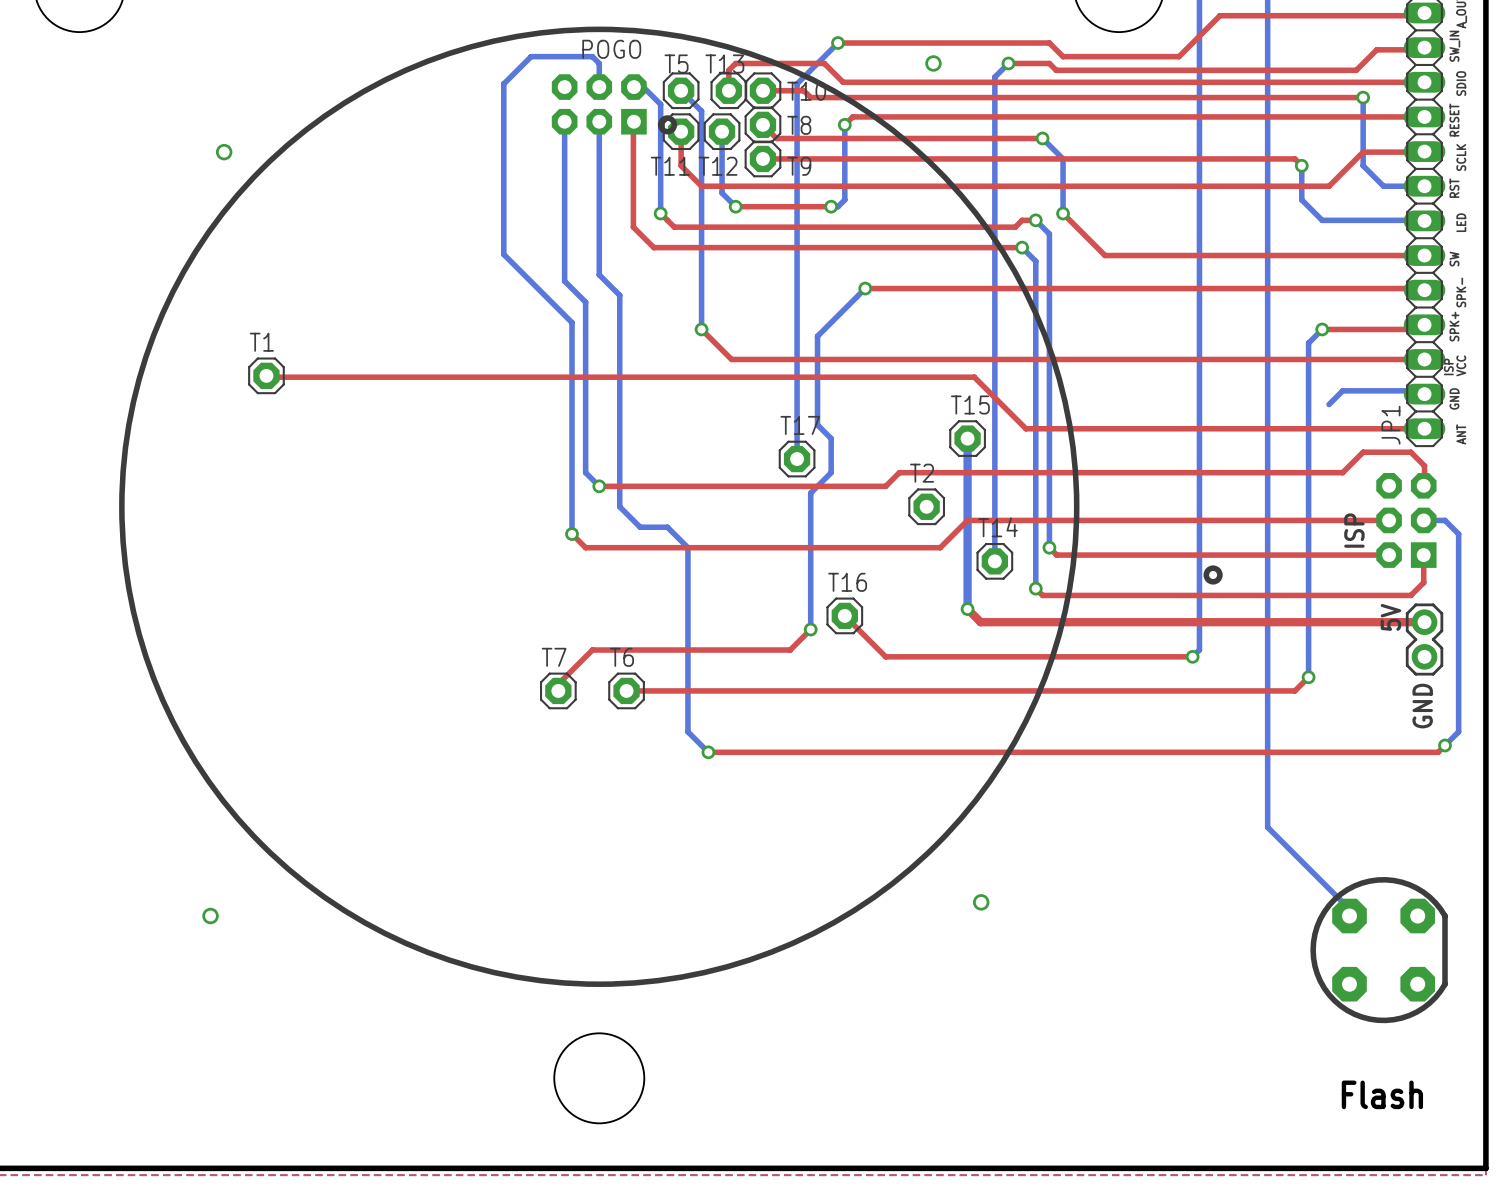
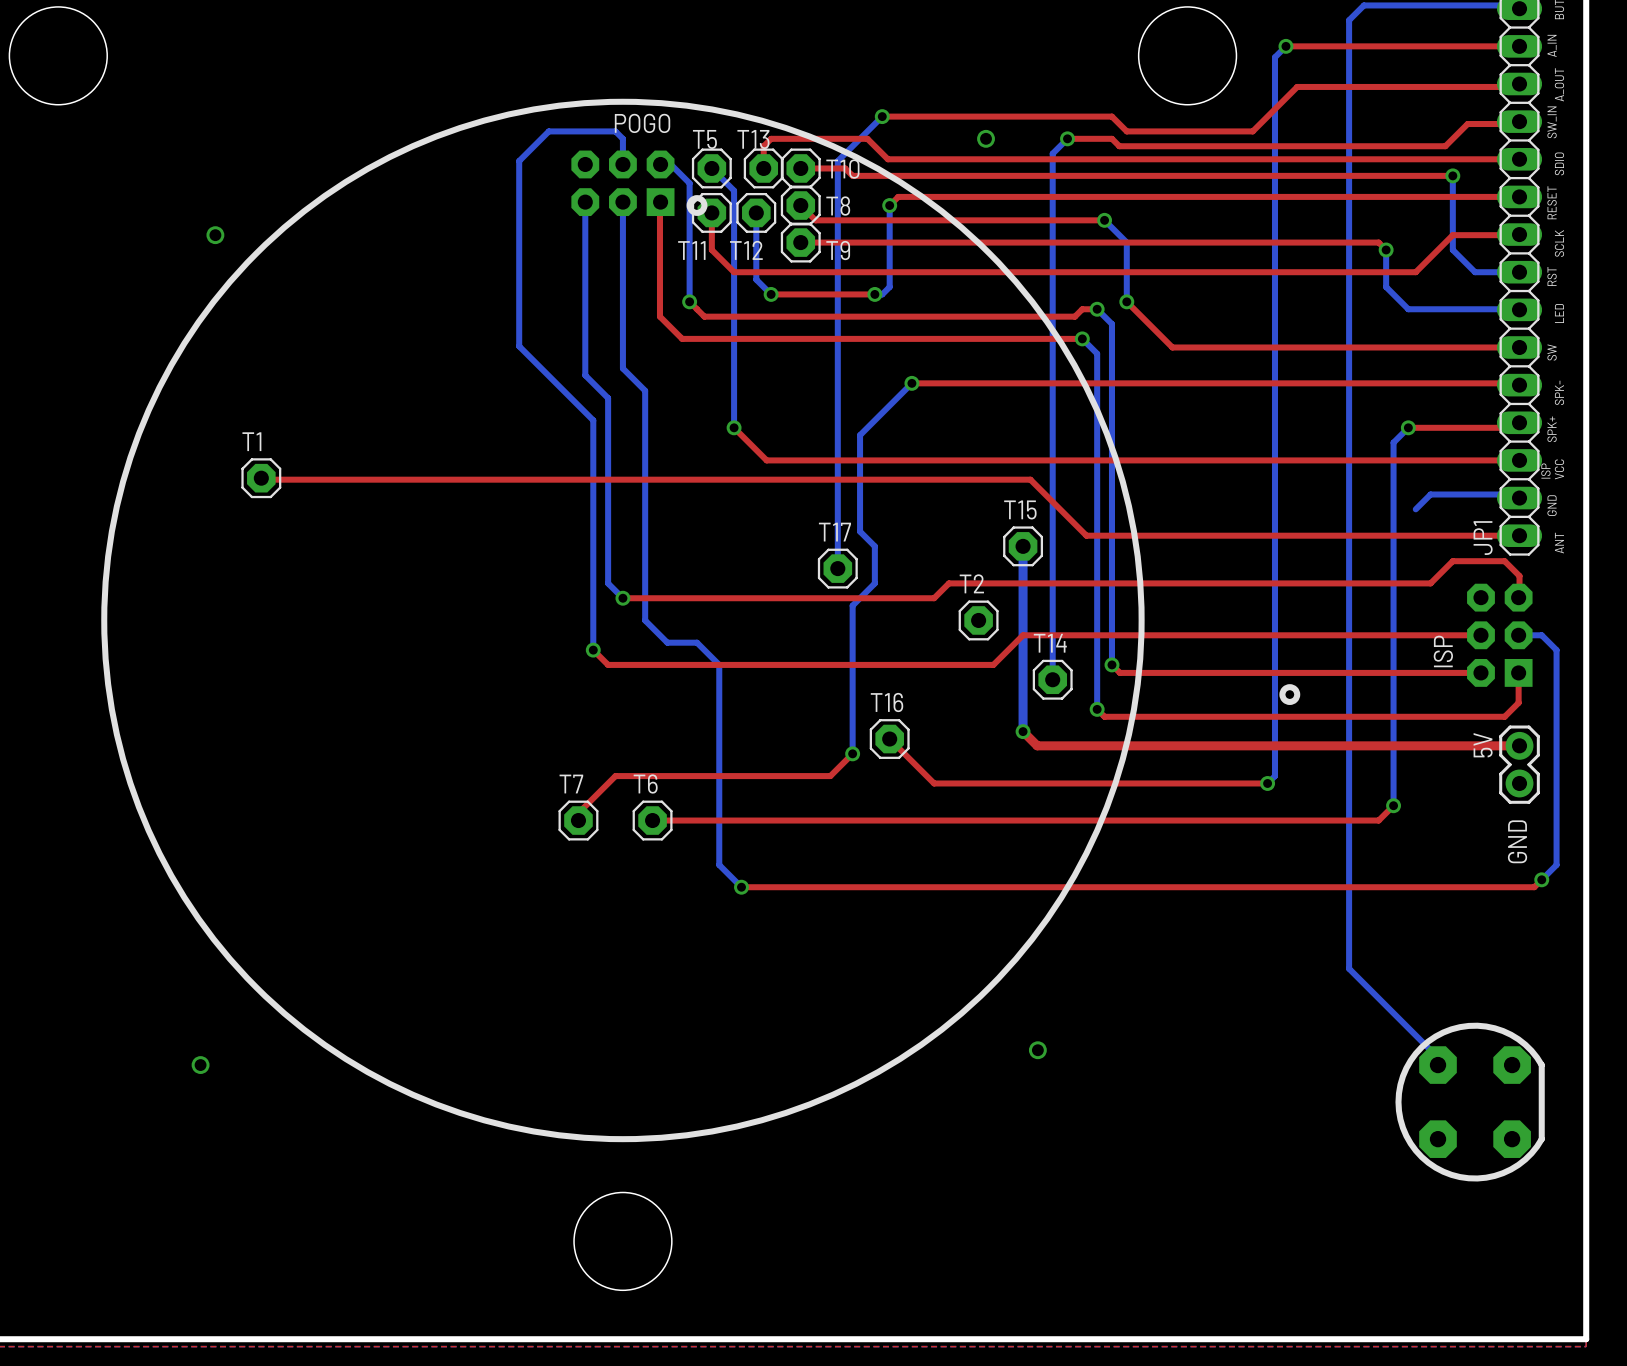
text: Flash (1382, 1094) -> none

